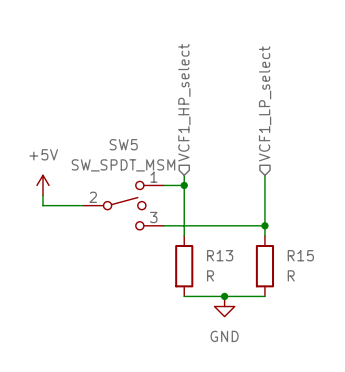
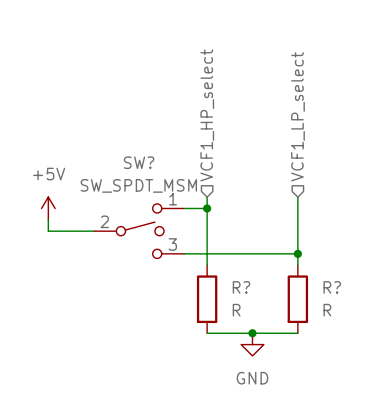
SW5 name: SW5 (123, 144) -> SW? (139, 162)
R13 name: R13 (220, 255) -> R? (241, 287)
R15 name: R15 (300, 255) -> R? (332, 287)

